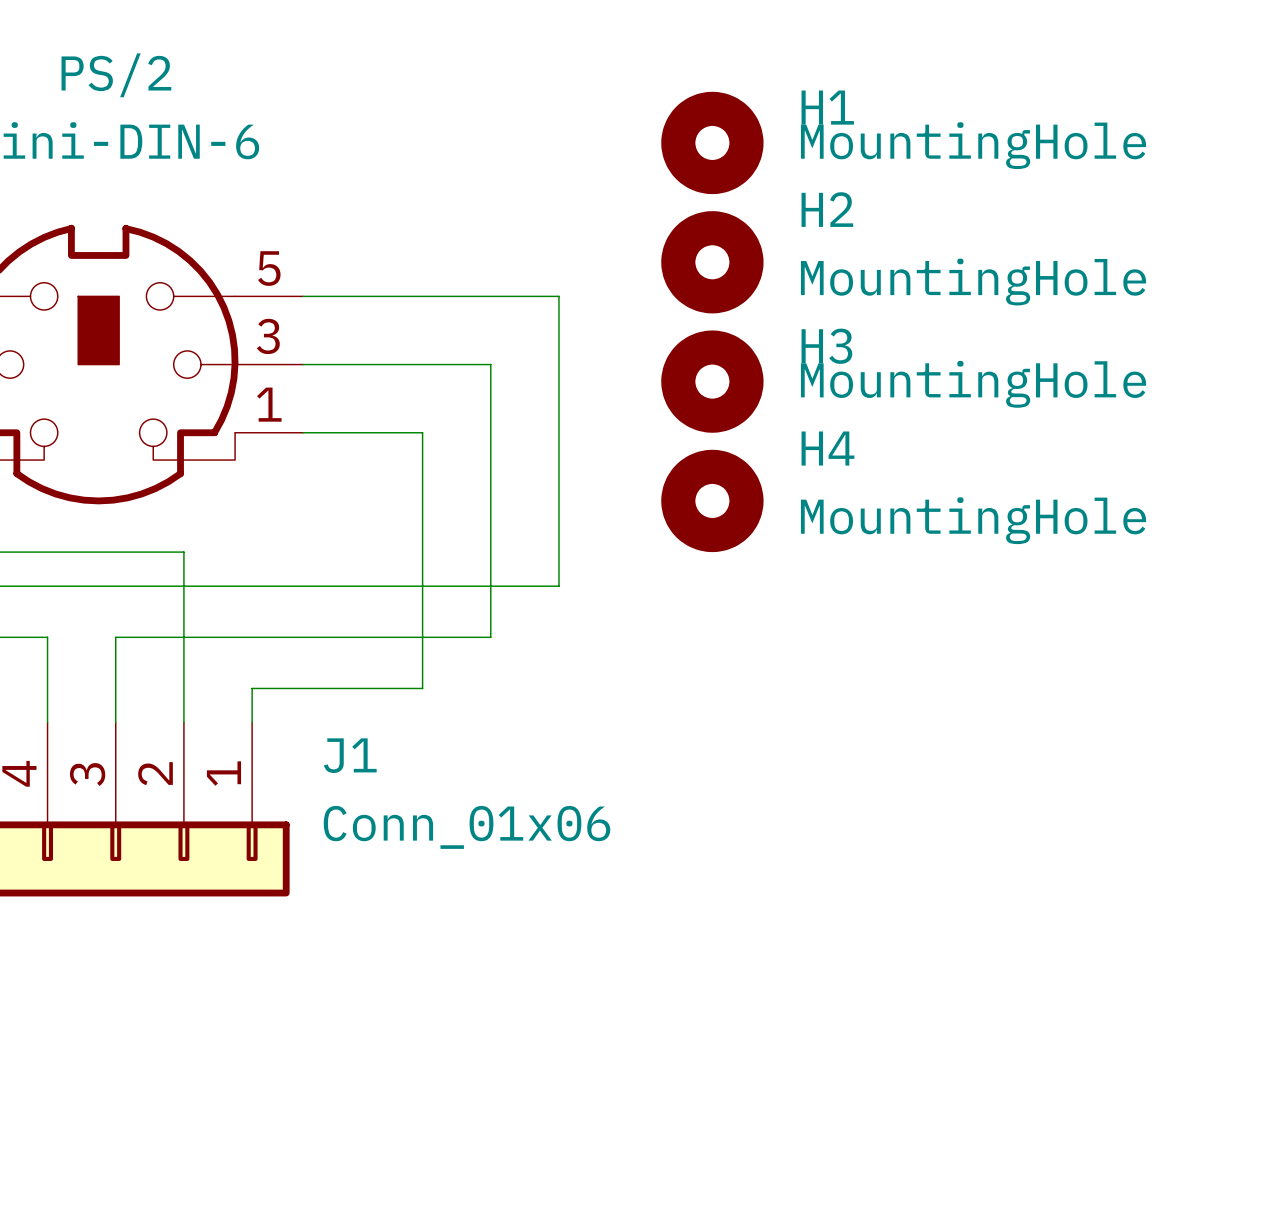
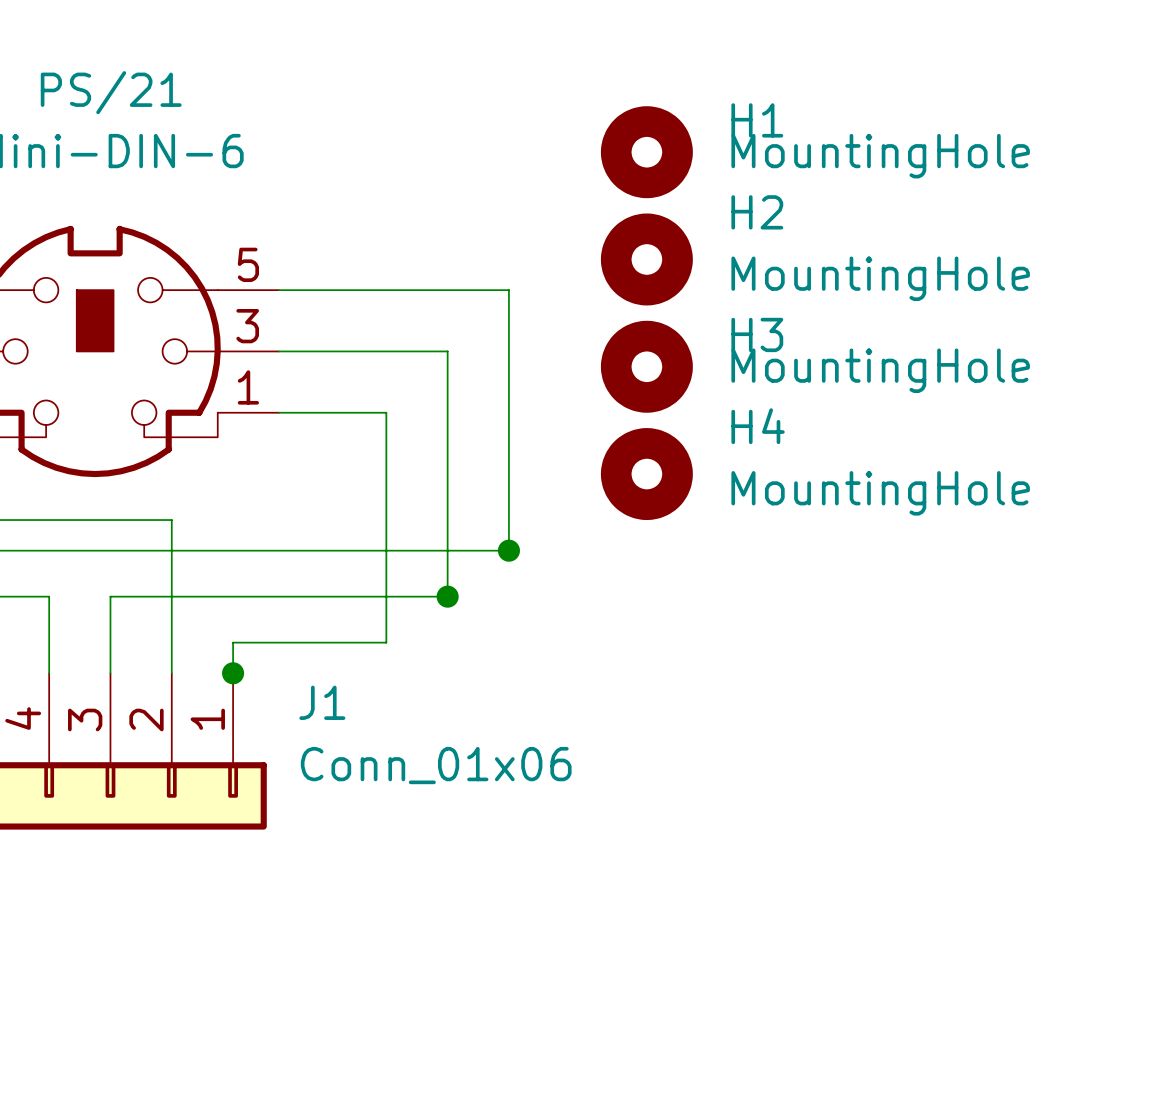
PS/2 name: PS/2 (116, 75) -> PS/21 (111, 92)
junction: none -> (508, 550)
junction: none -> (447, 596)
junction: none -> (233, 673)

